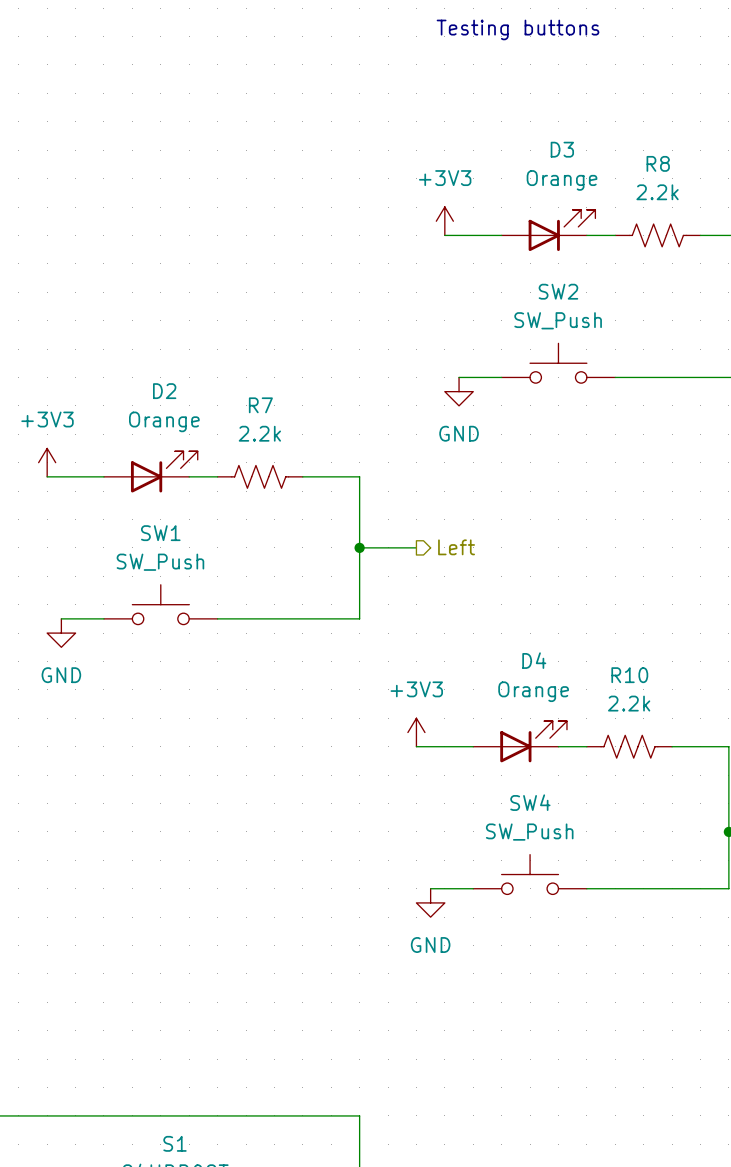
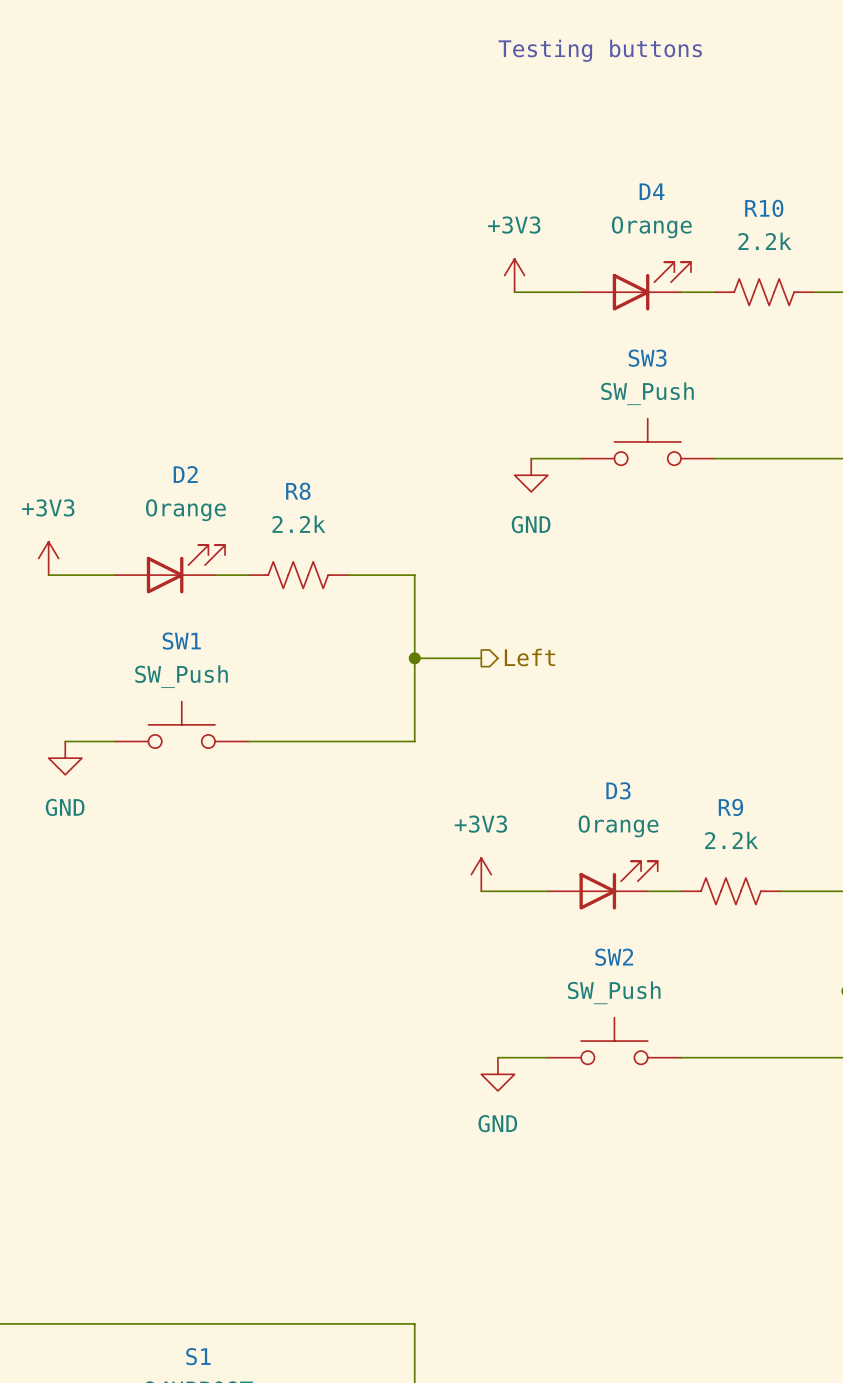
D3 name: D3 (562, 149) -> D4 (652, 191)
R8 name: R8 (658, 163) -> R10 (764, 208)
SW2 name: SW2 (558, 291) -> SW3 (647, 358)
R7 name: R7 (260, 405) -> R8 (298, 491)
D4 name: D4 (534, 660) -> D3 (618, 790)
R10 name: R10 (629, 675) -> R9 (730, 807)
SW4 name: SW4 (530, 802) -> SW2 (614, 957)

